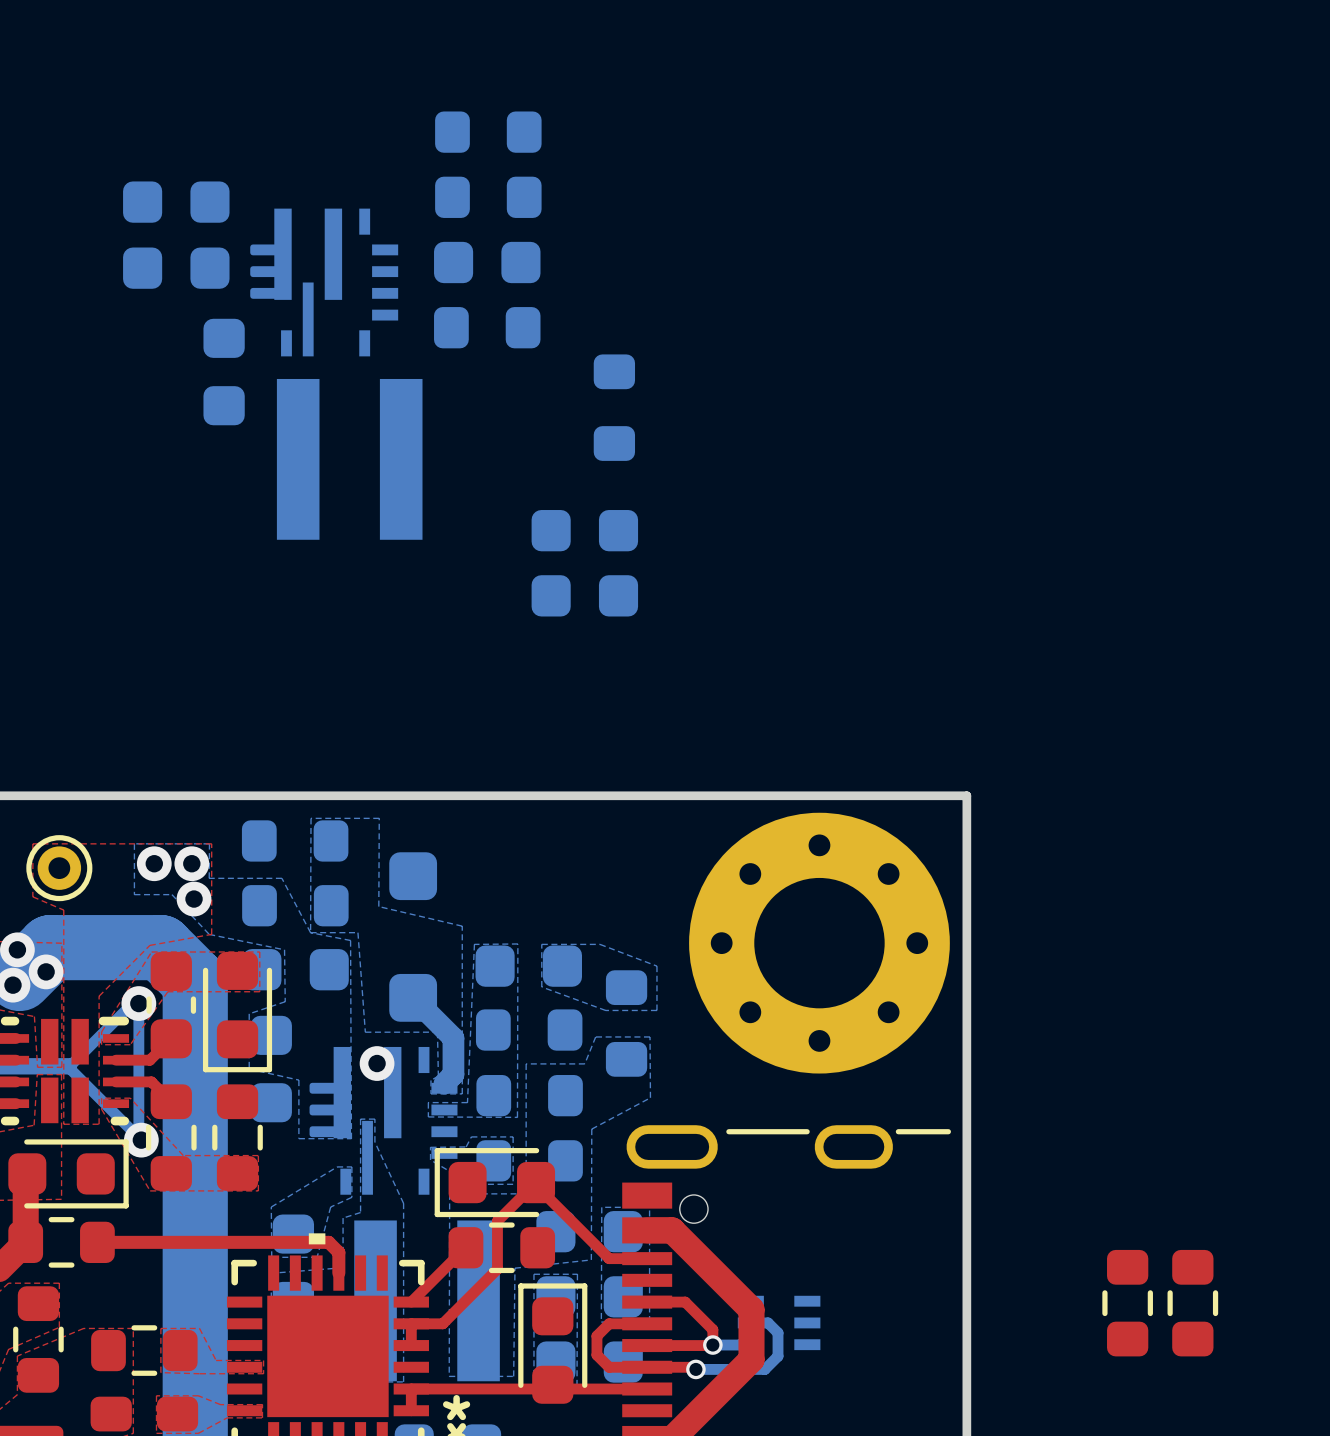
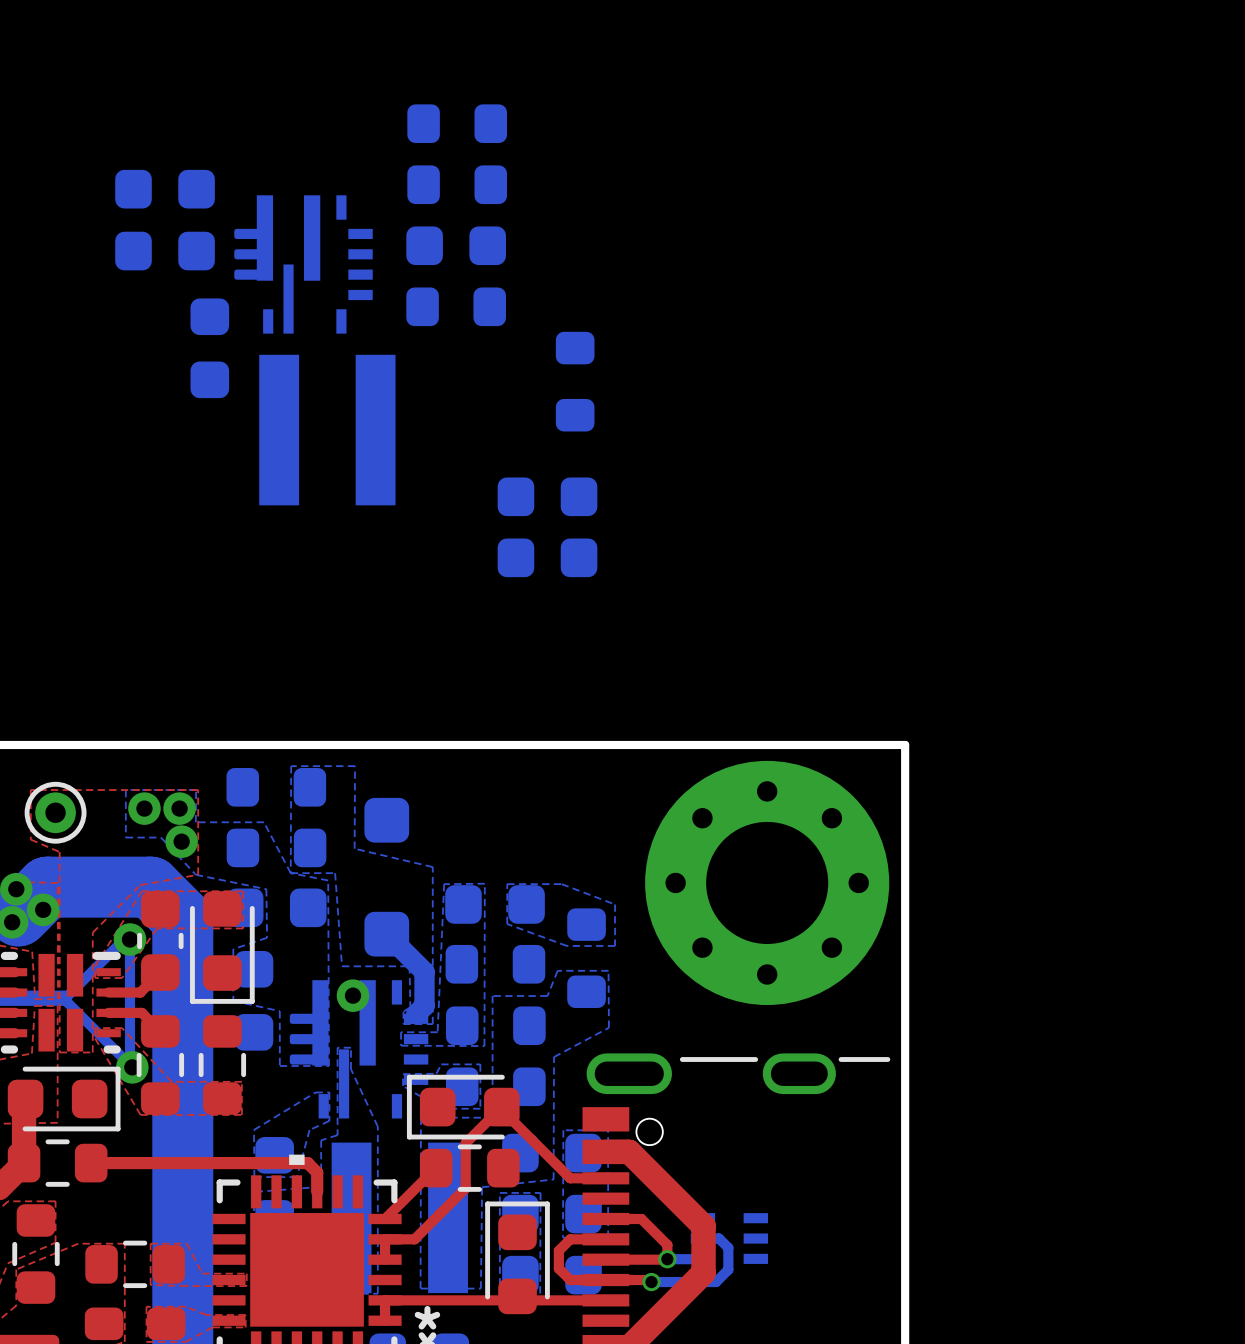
part: (1127, 1303) -> none
part: (1192, 1303) -> none

